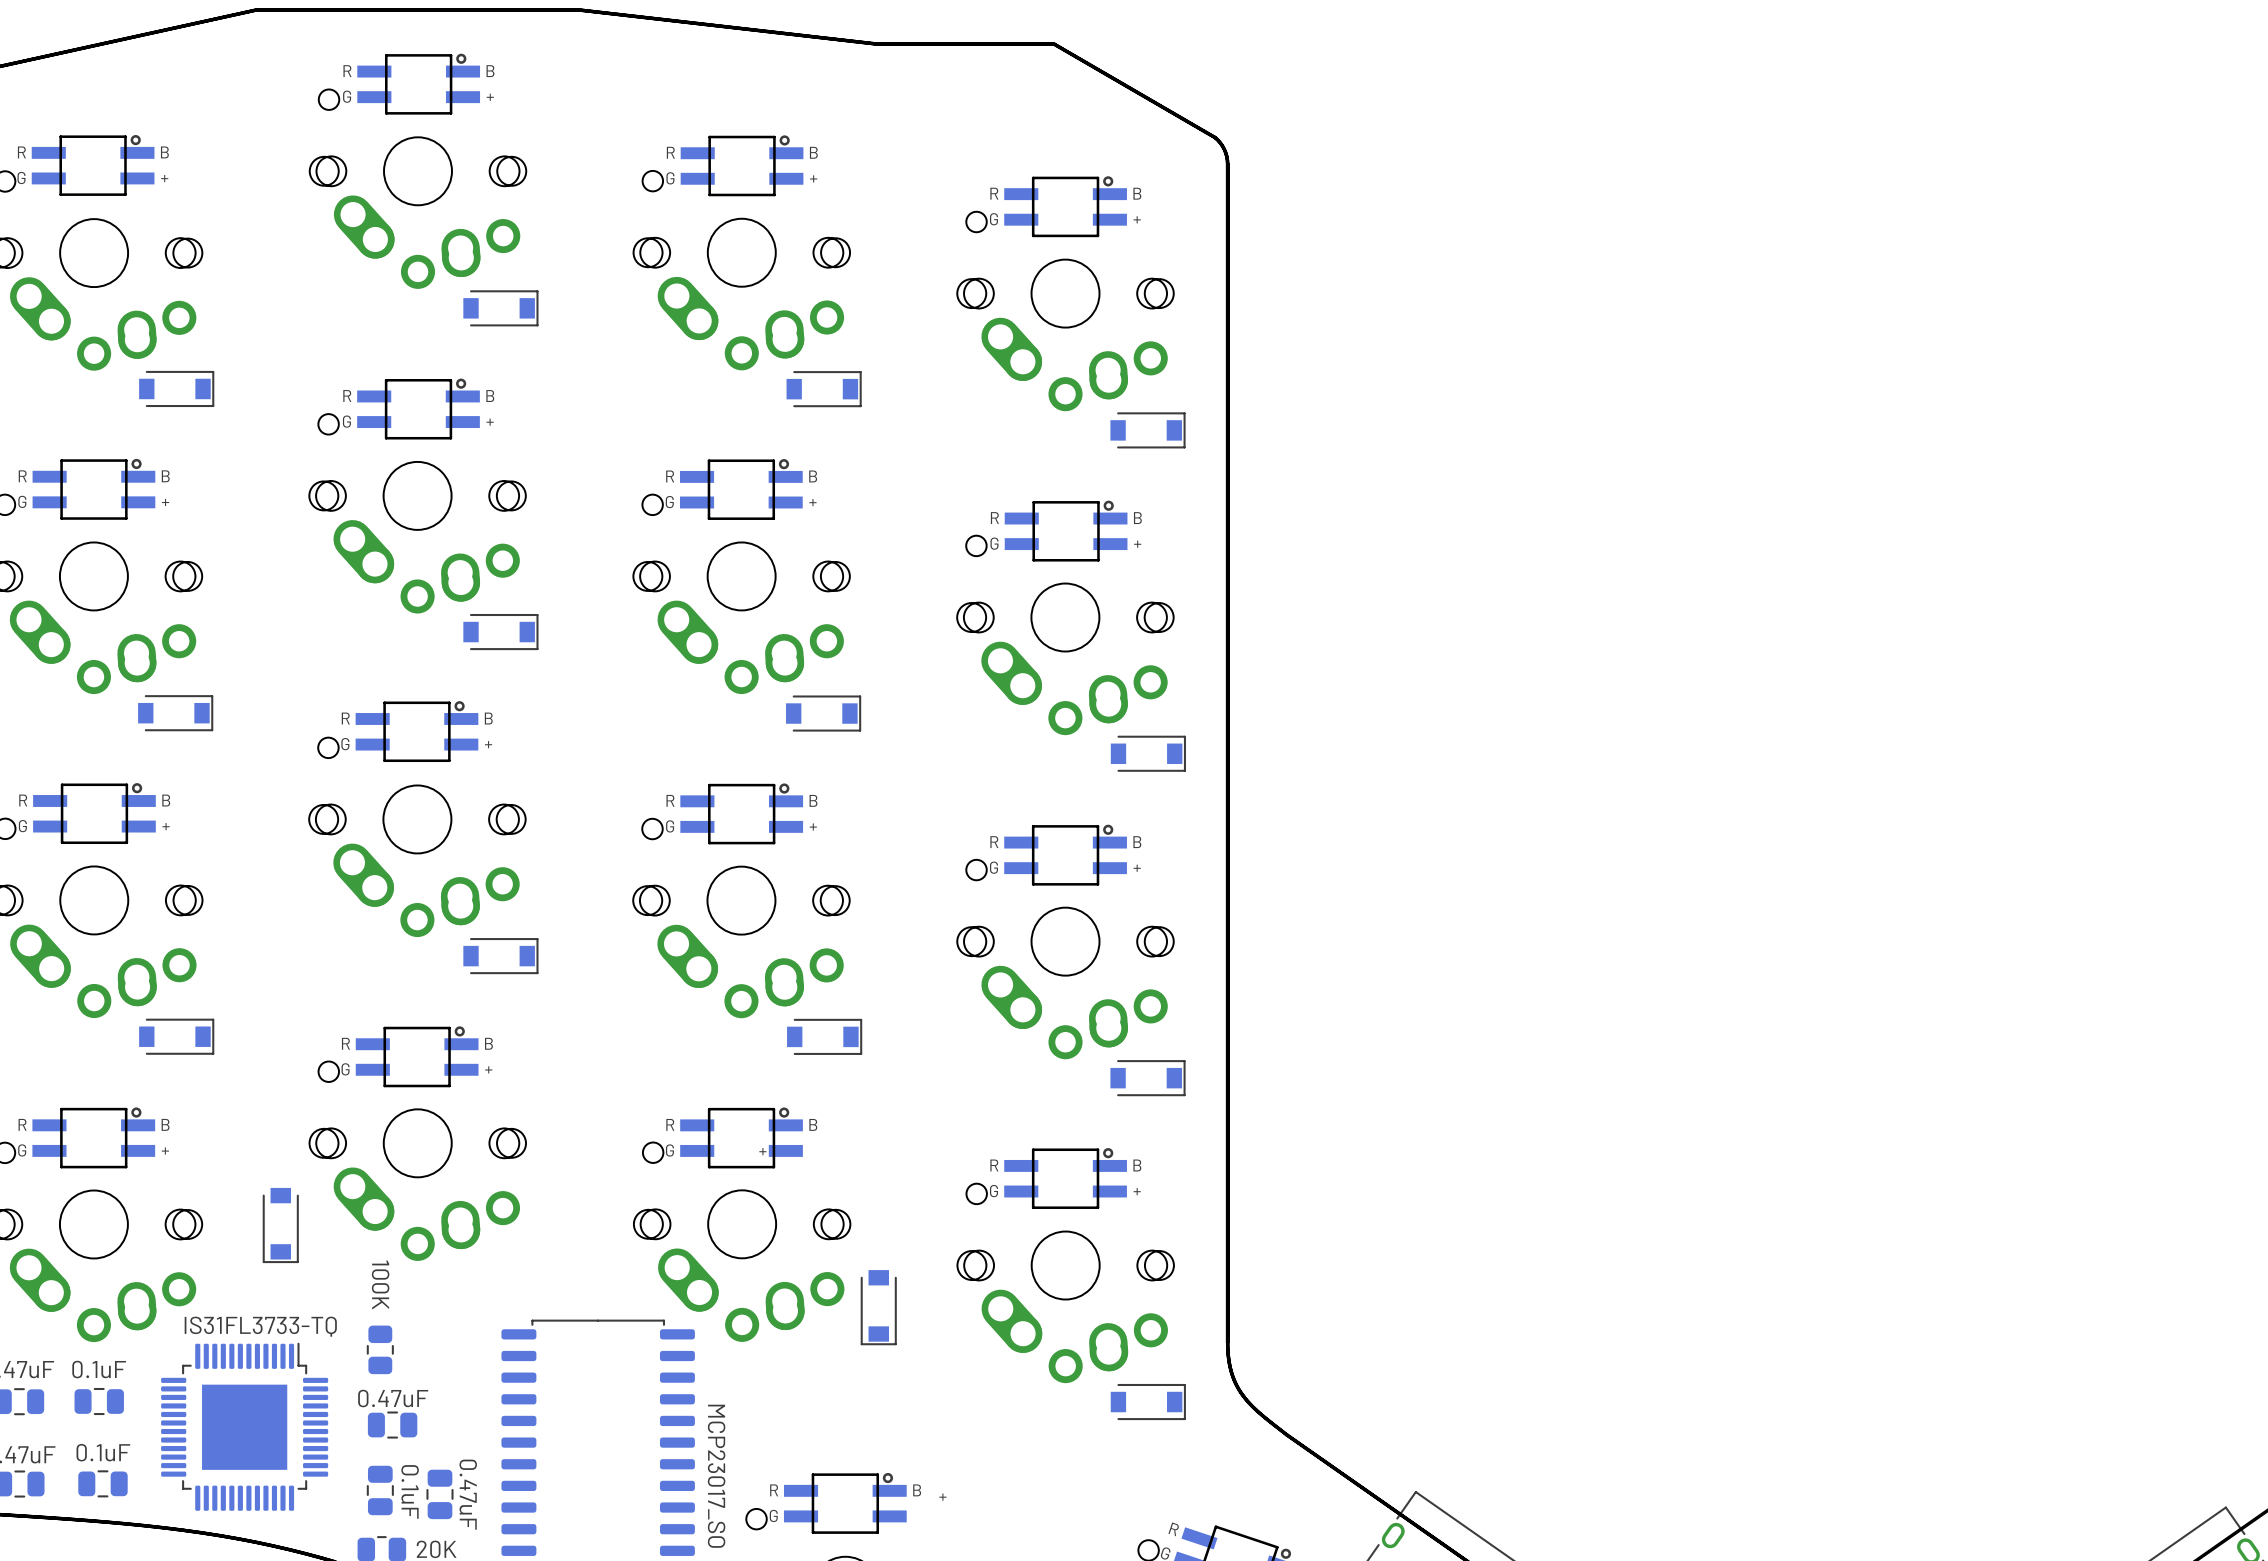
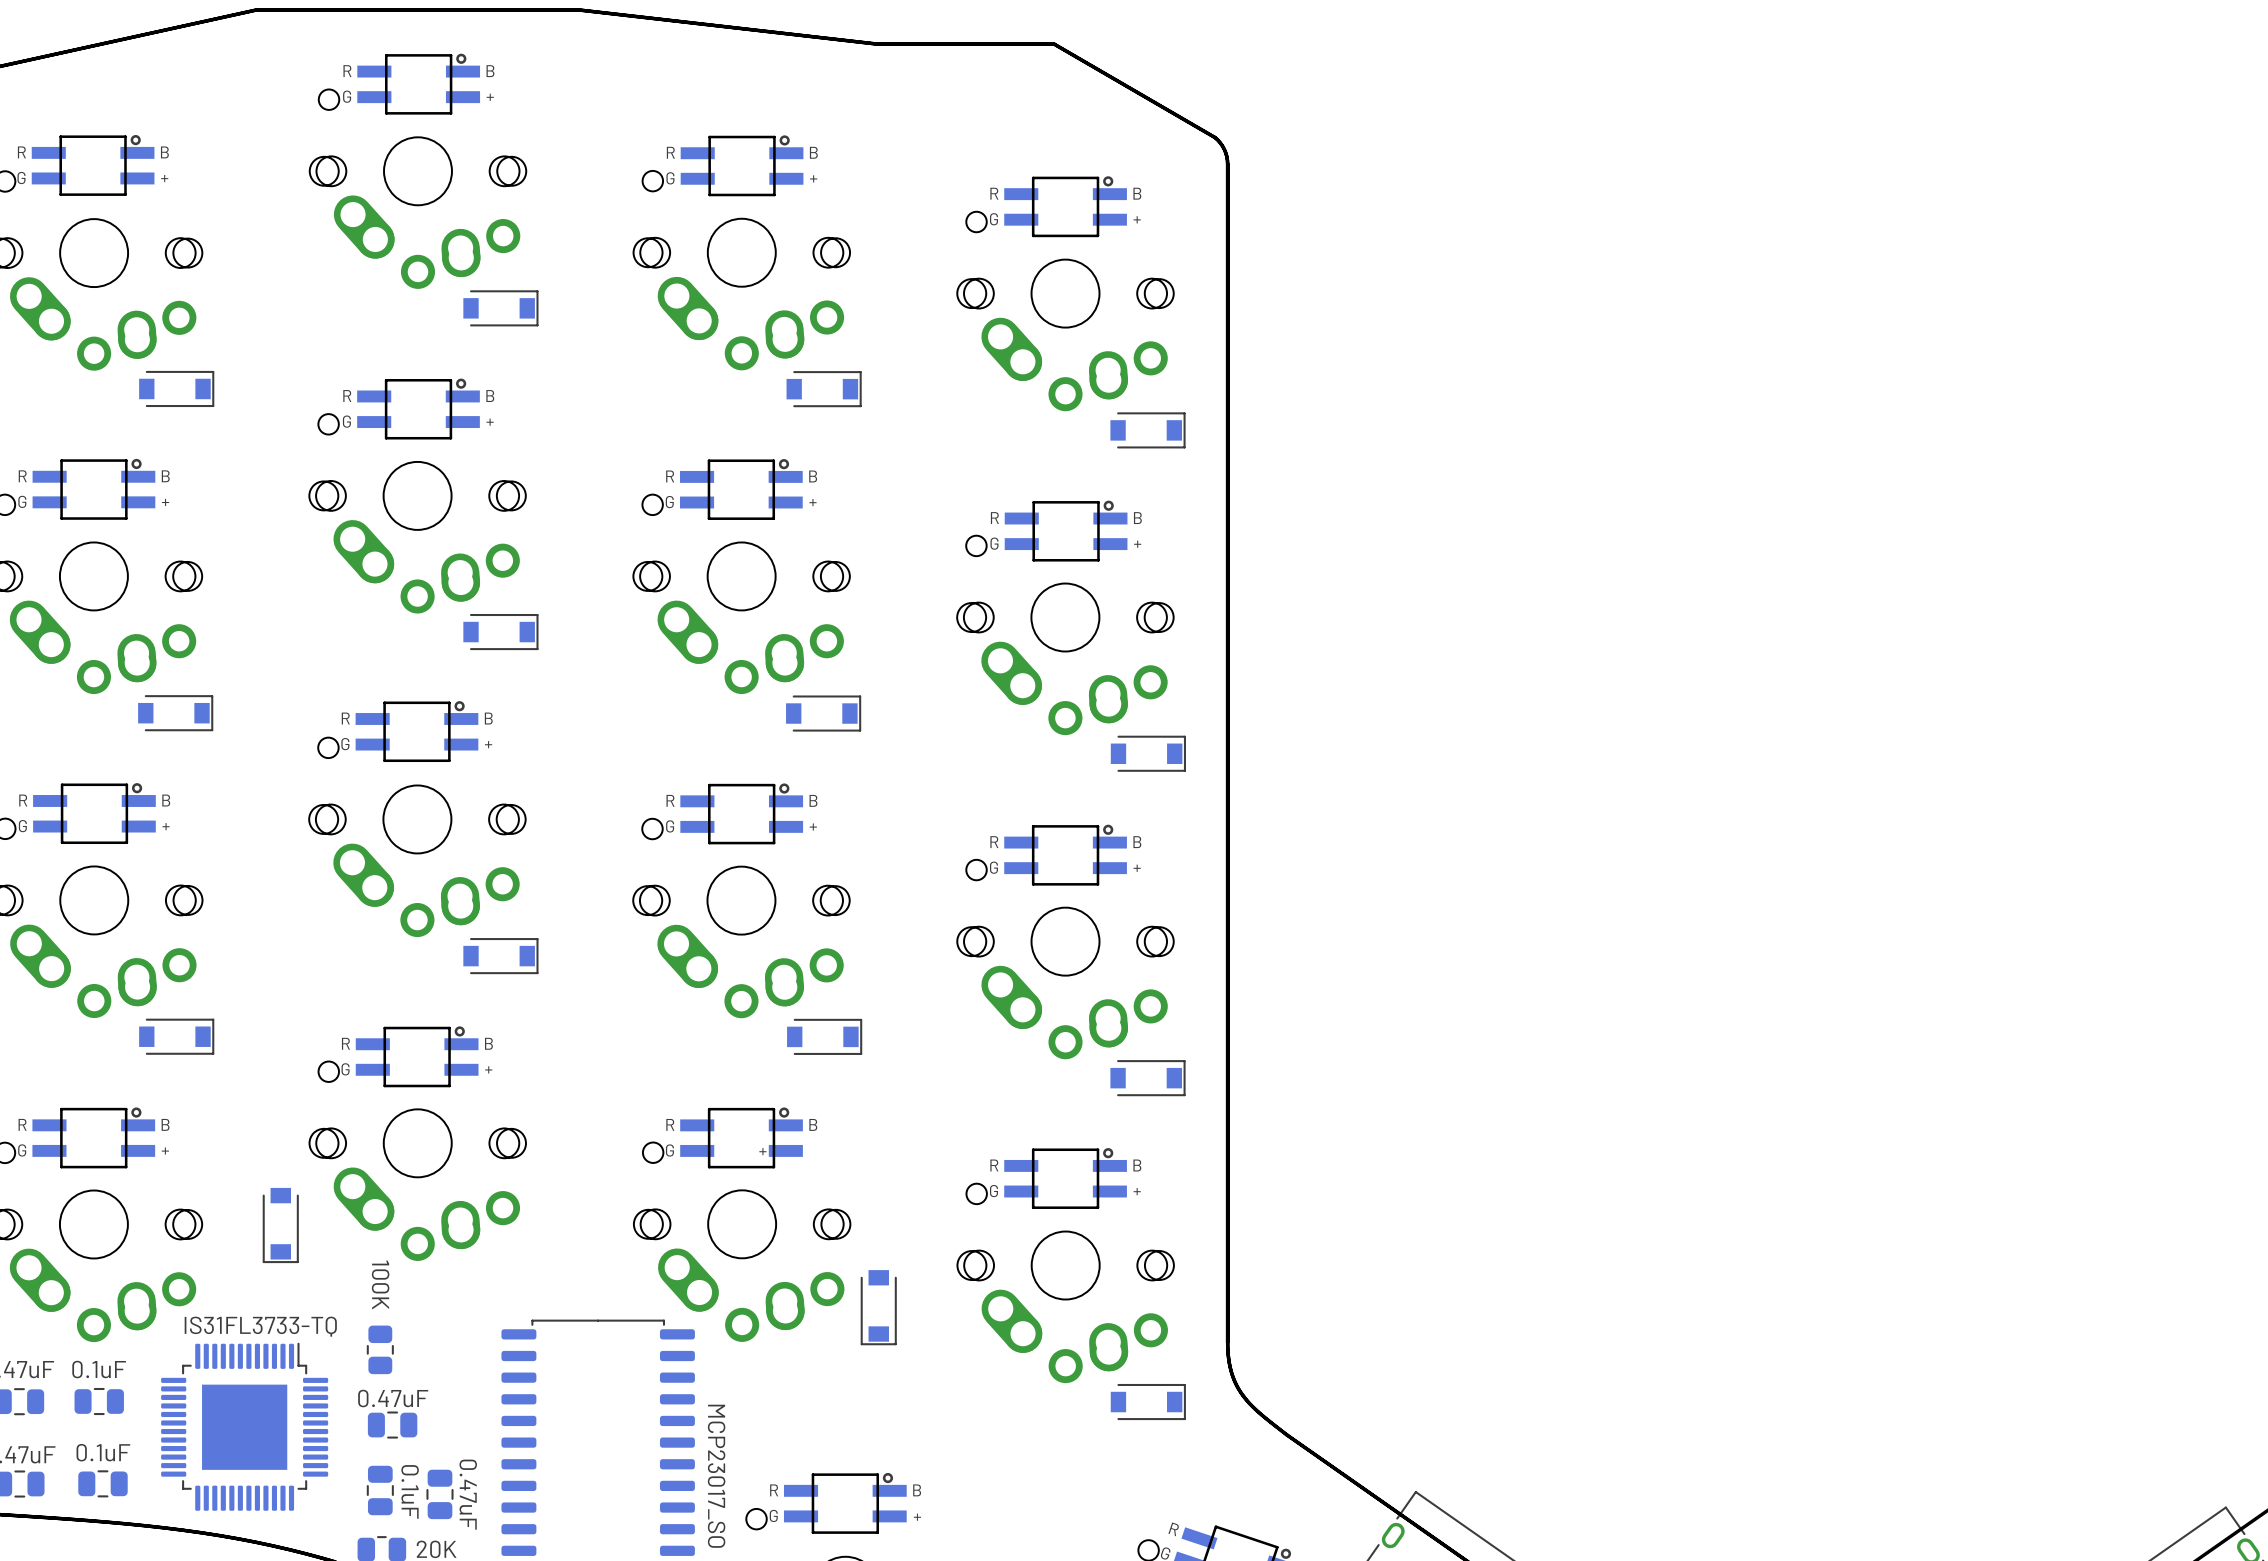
part text position: + (942, 1497) -> + (917, 1517)

